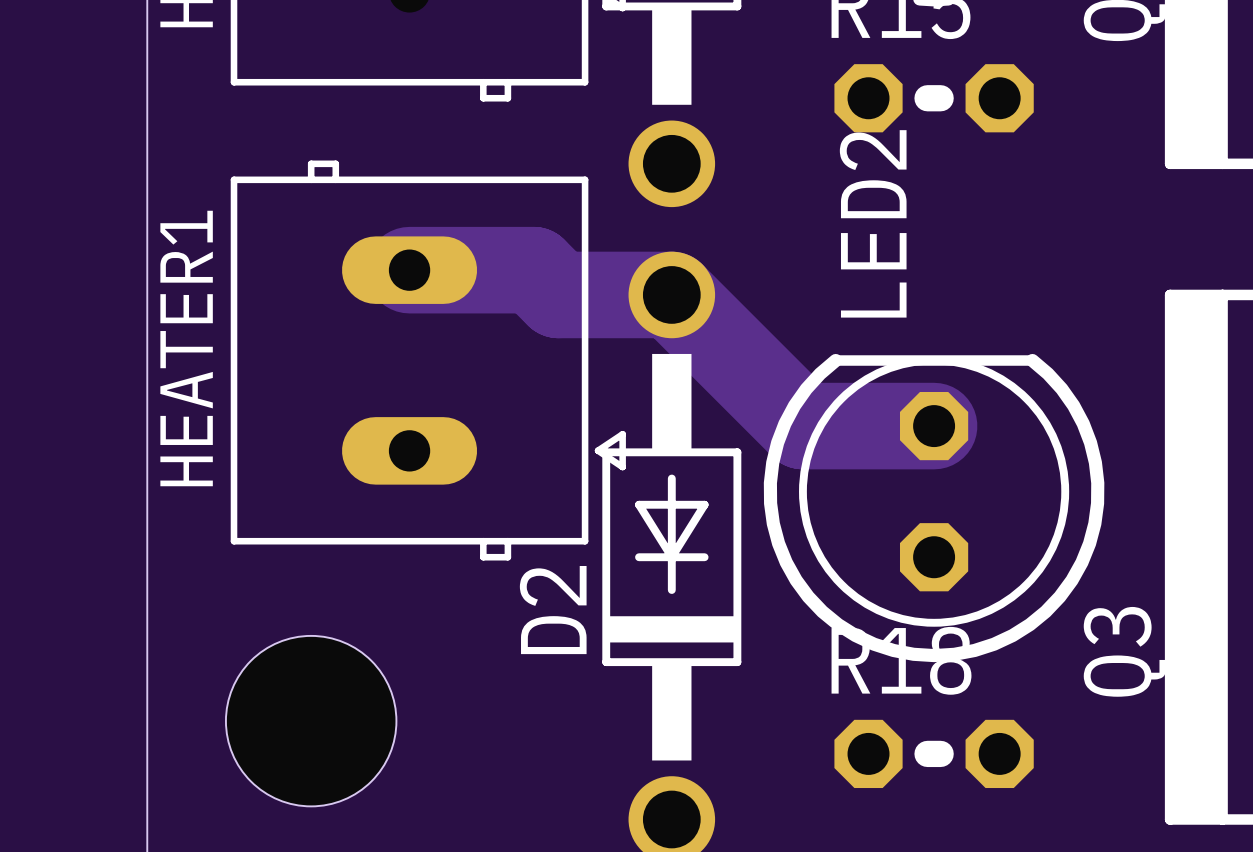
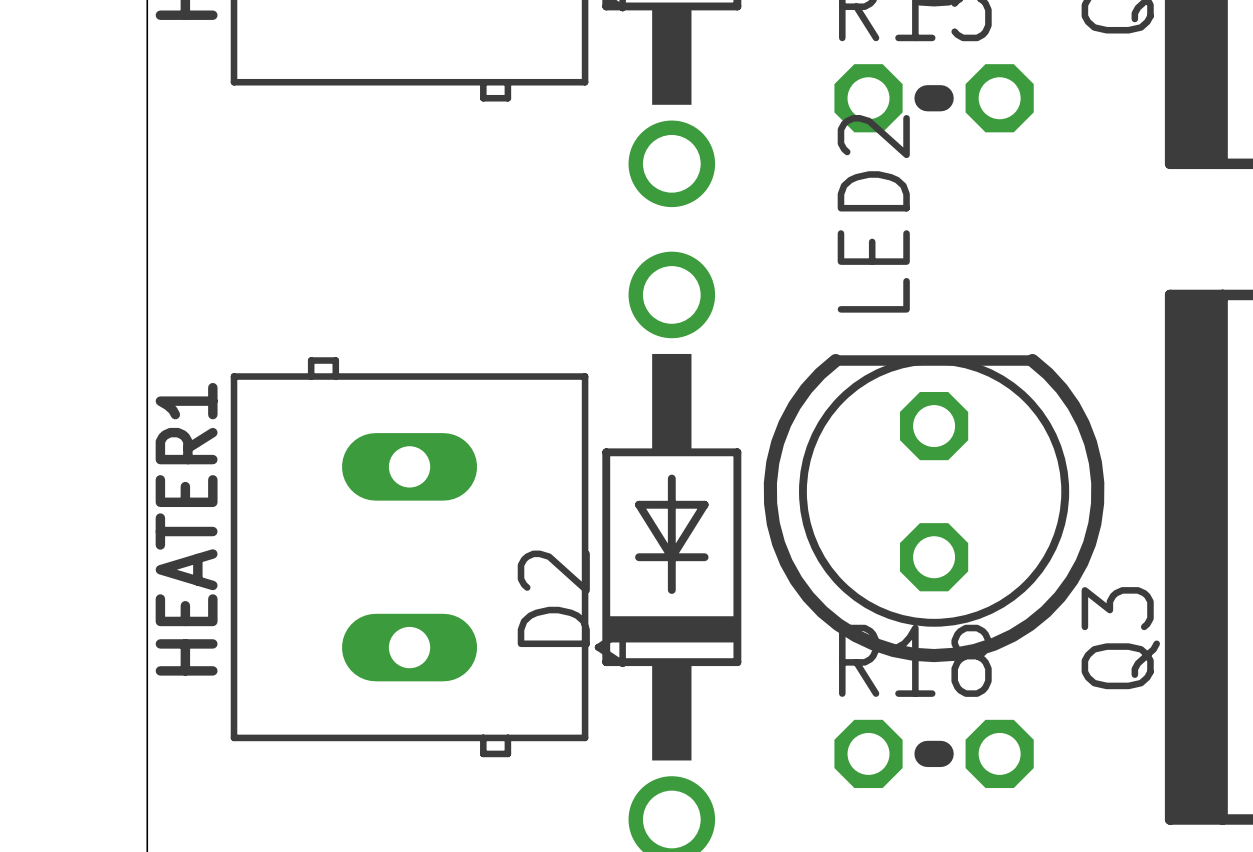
track: (409, 270) (533, 270) (558, 294) (671, 294) (802, 426) (934, 426) -> none
HEATER1 position: (428, 360) -> (428, 557)
part: (311, 721) -> none

